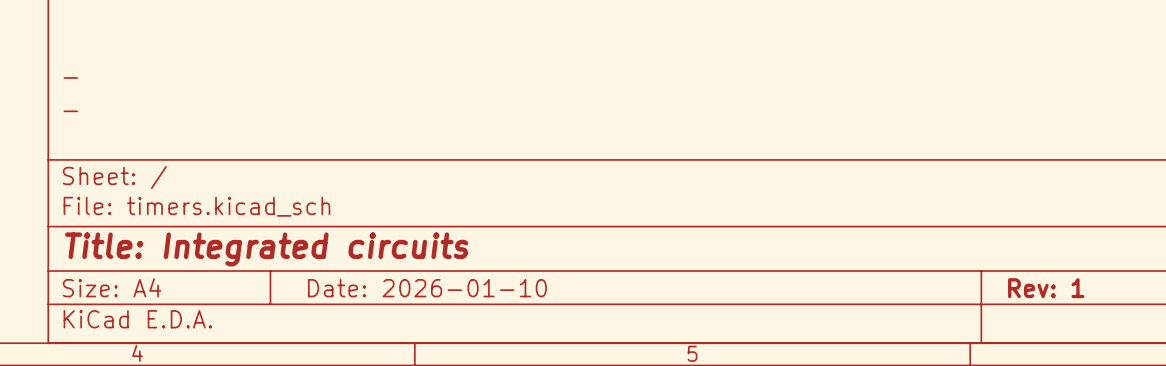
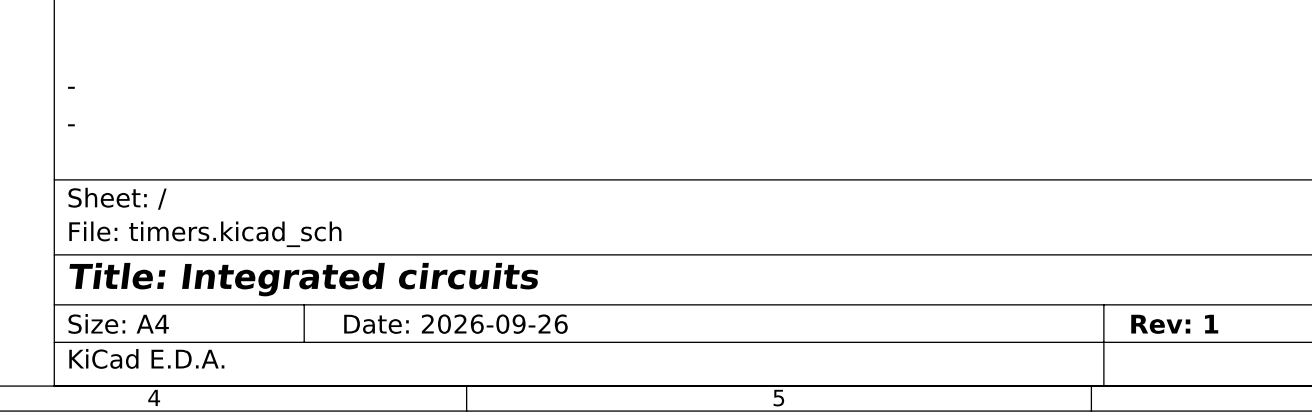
title block: Date: 2026-01-10 (427, 288) -> Date: 2026-09-26 (455, 324)

